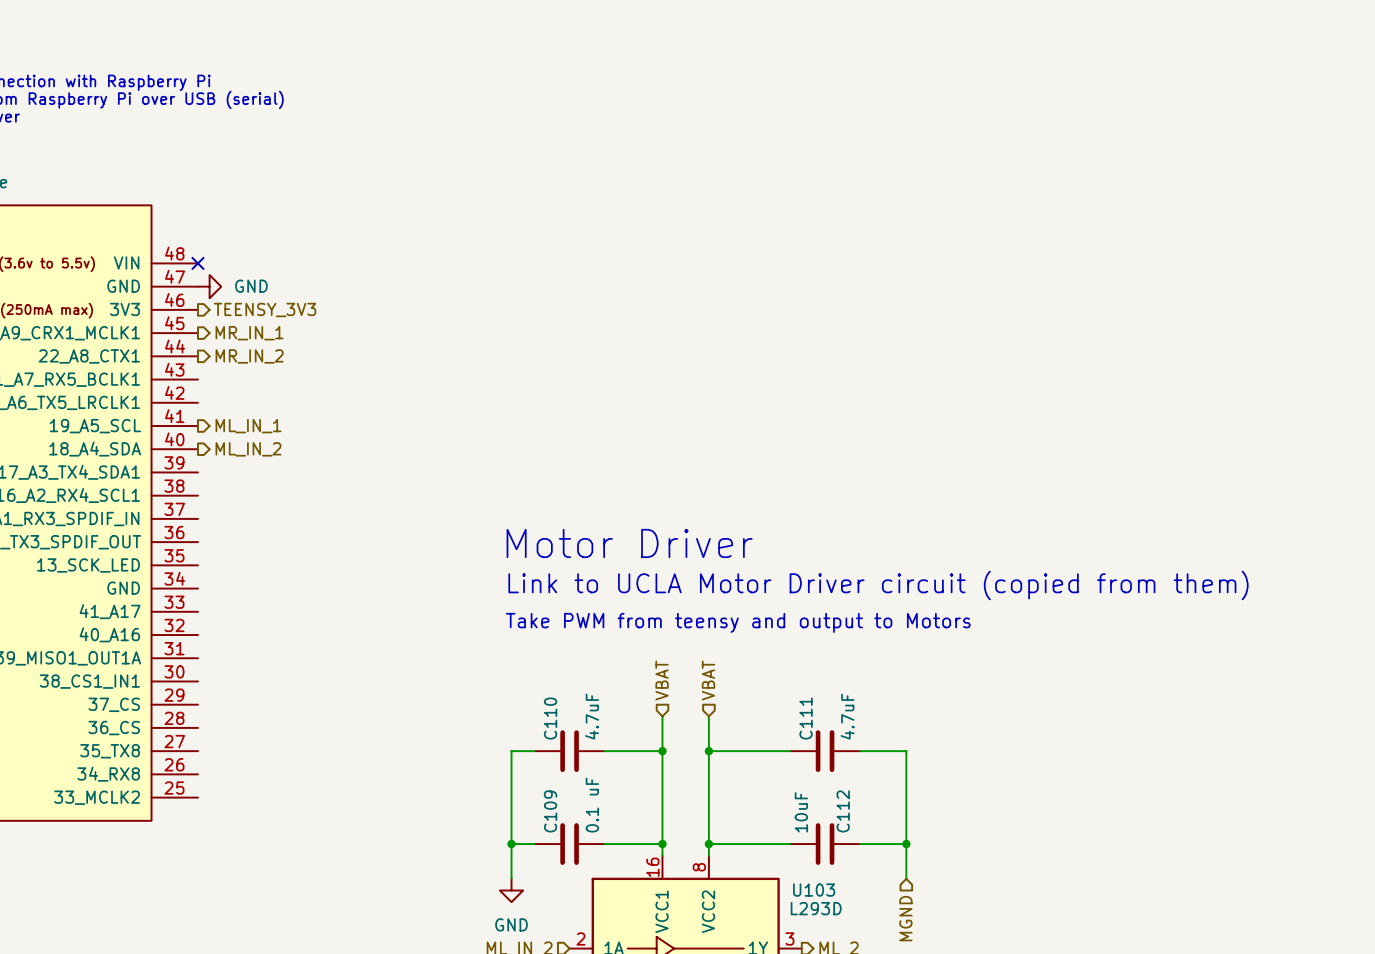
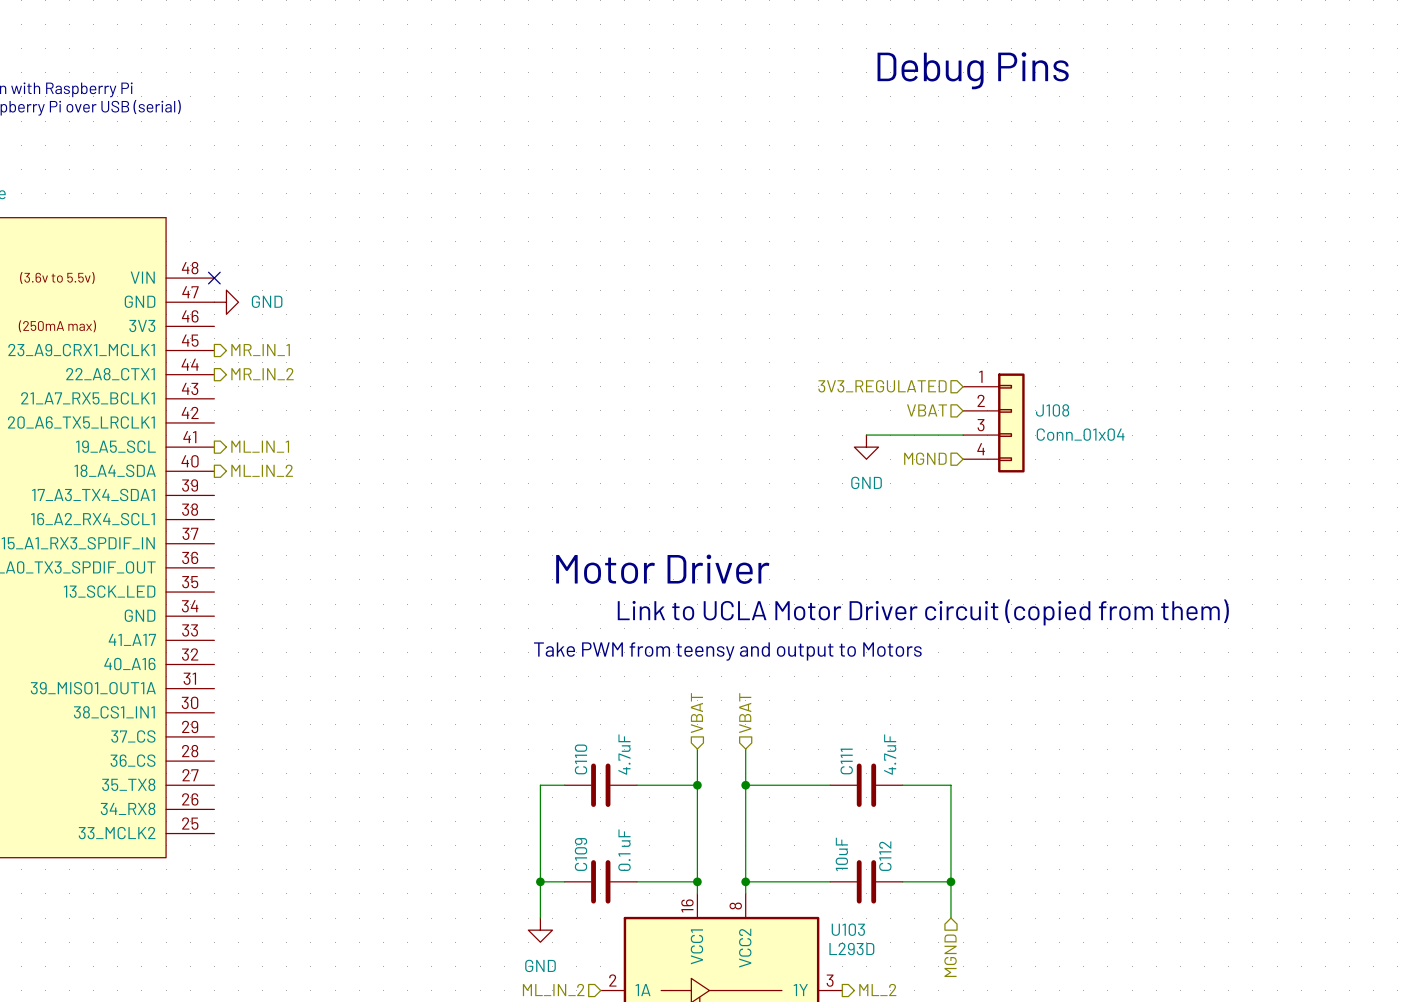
text: none -> Debug Pins (973, 70)
hierarchical label: TEENSY_3V3 (265, 310) -> none
hierarchical label: none -> 3V3_REGULATED (882, 386)
hierarchical label: none -> VBAT (927, 410)
J108: none -> Conn_01x04 (993, 422)
wire: none -> (866, 435) (963, 435)
power symbol: none -> GND (866, 447)
hierarchical label: none -> MGND (925, 458)

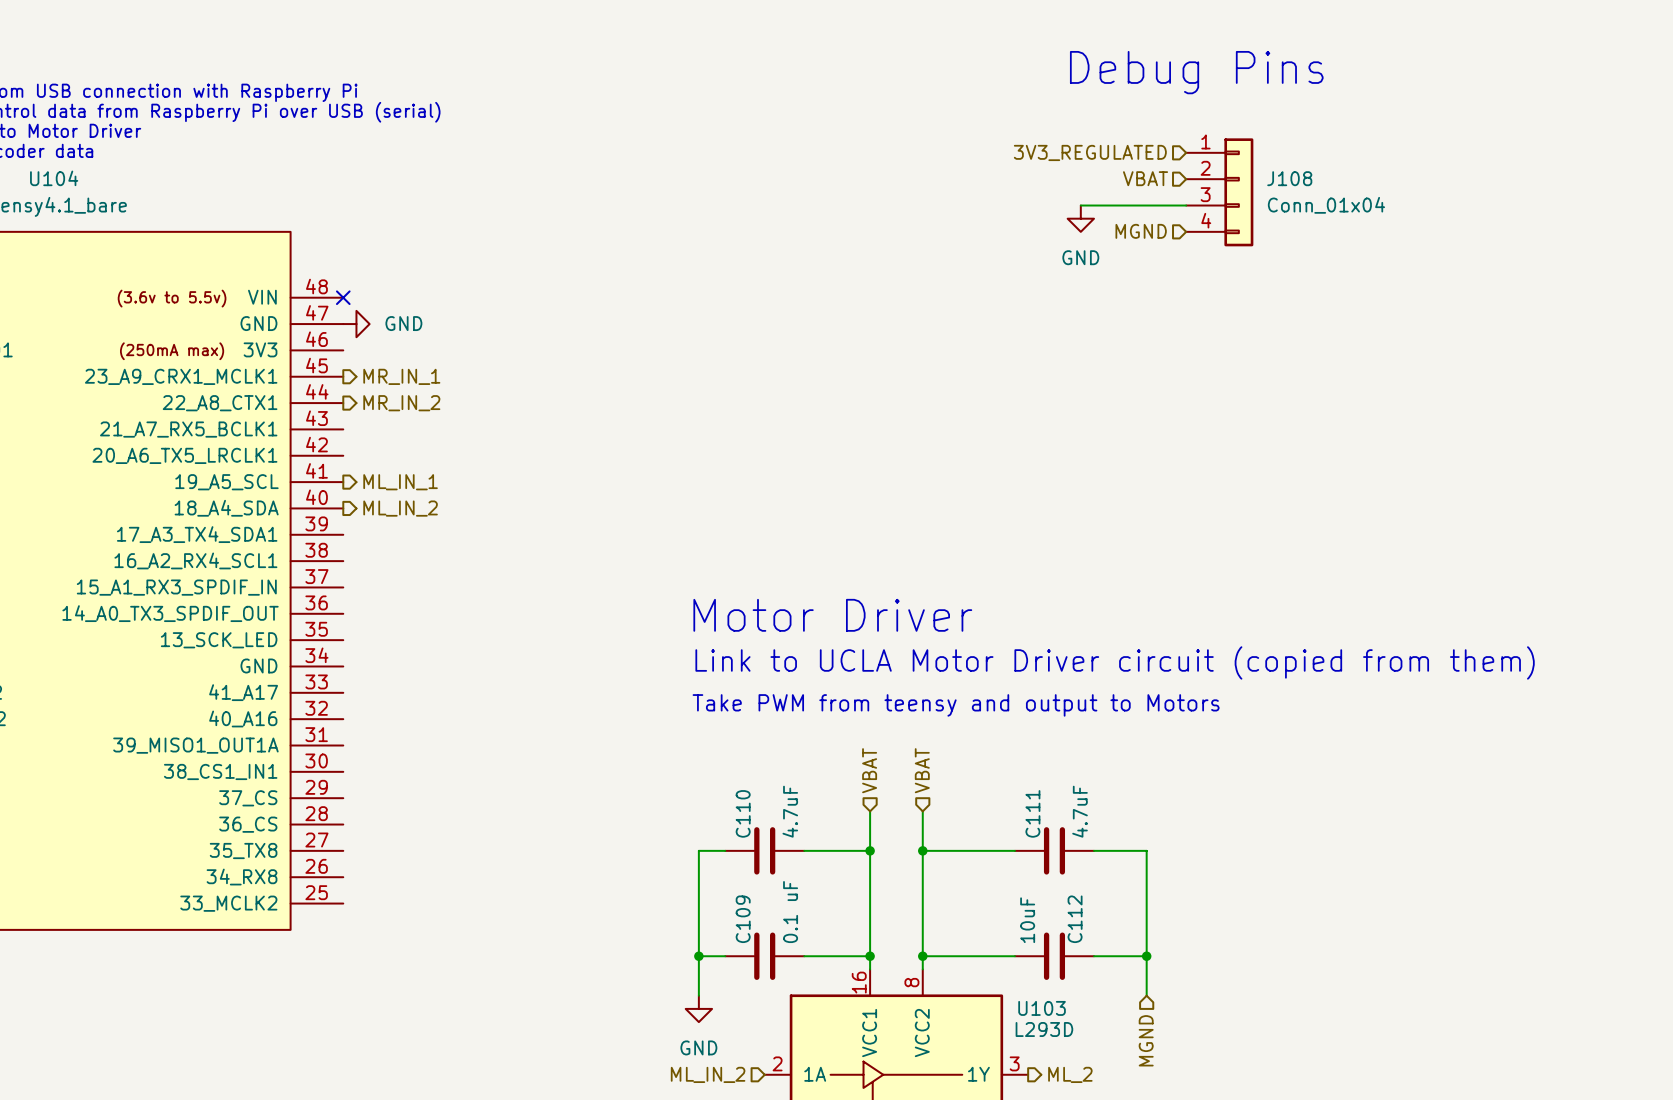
hierarchical label: none -> 3V3_REGULATED (1090, 152)
hierarchical label: none -> VBAT (1145, 178)
wire: none -> (1080, 205) (1186, 205)
power symbol: none -> GND (1080, 218)
hierarchical label: none -> MGND (1141, 231)
hierarchical label: 3V3_REGULATED (882, 386) -> none
hierarchical label: VBAT (927, 410) -> none
J108 position: (993, 422) -> (1219, 192)
wire: (866, 435) (963, 435) -> none
power symbol: GND (866, 447) -> none
hierarchical label: MGND (925, 458) -> none

